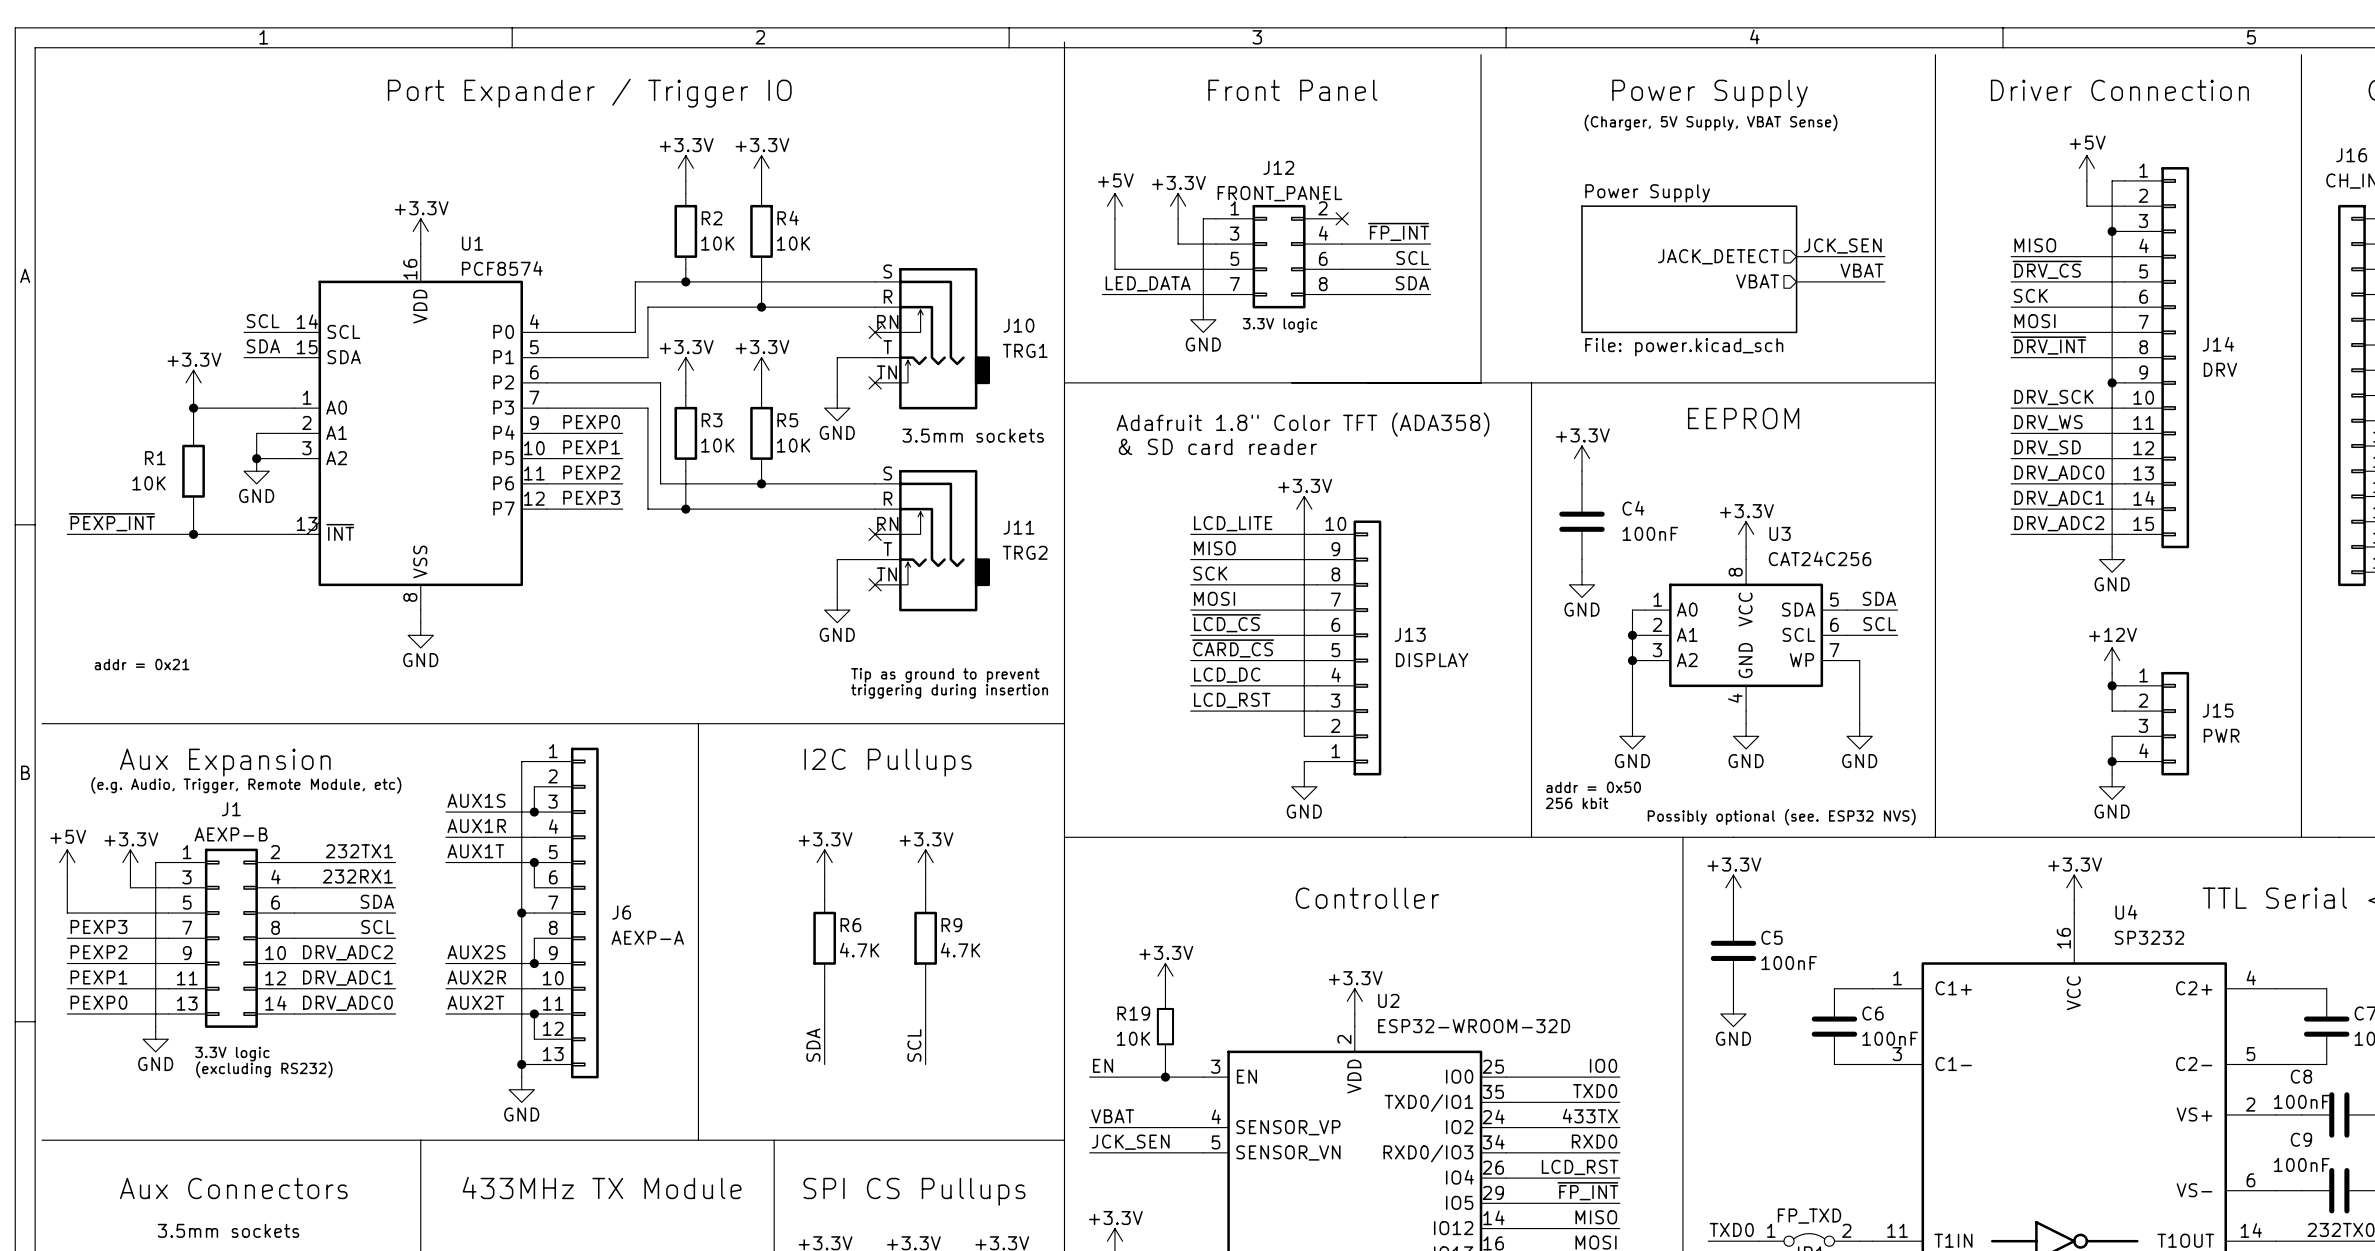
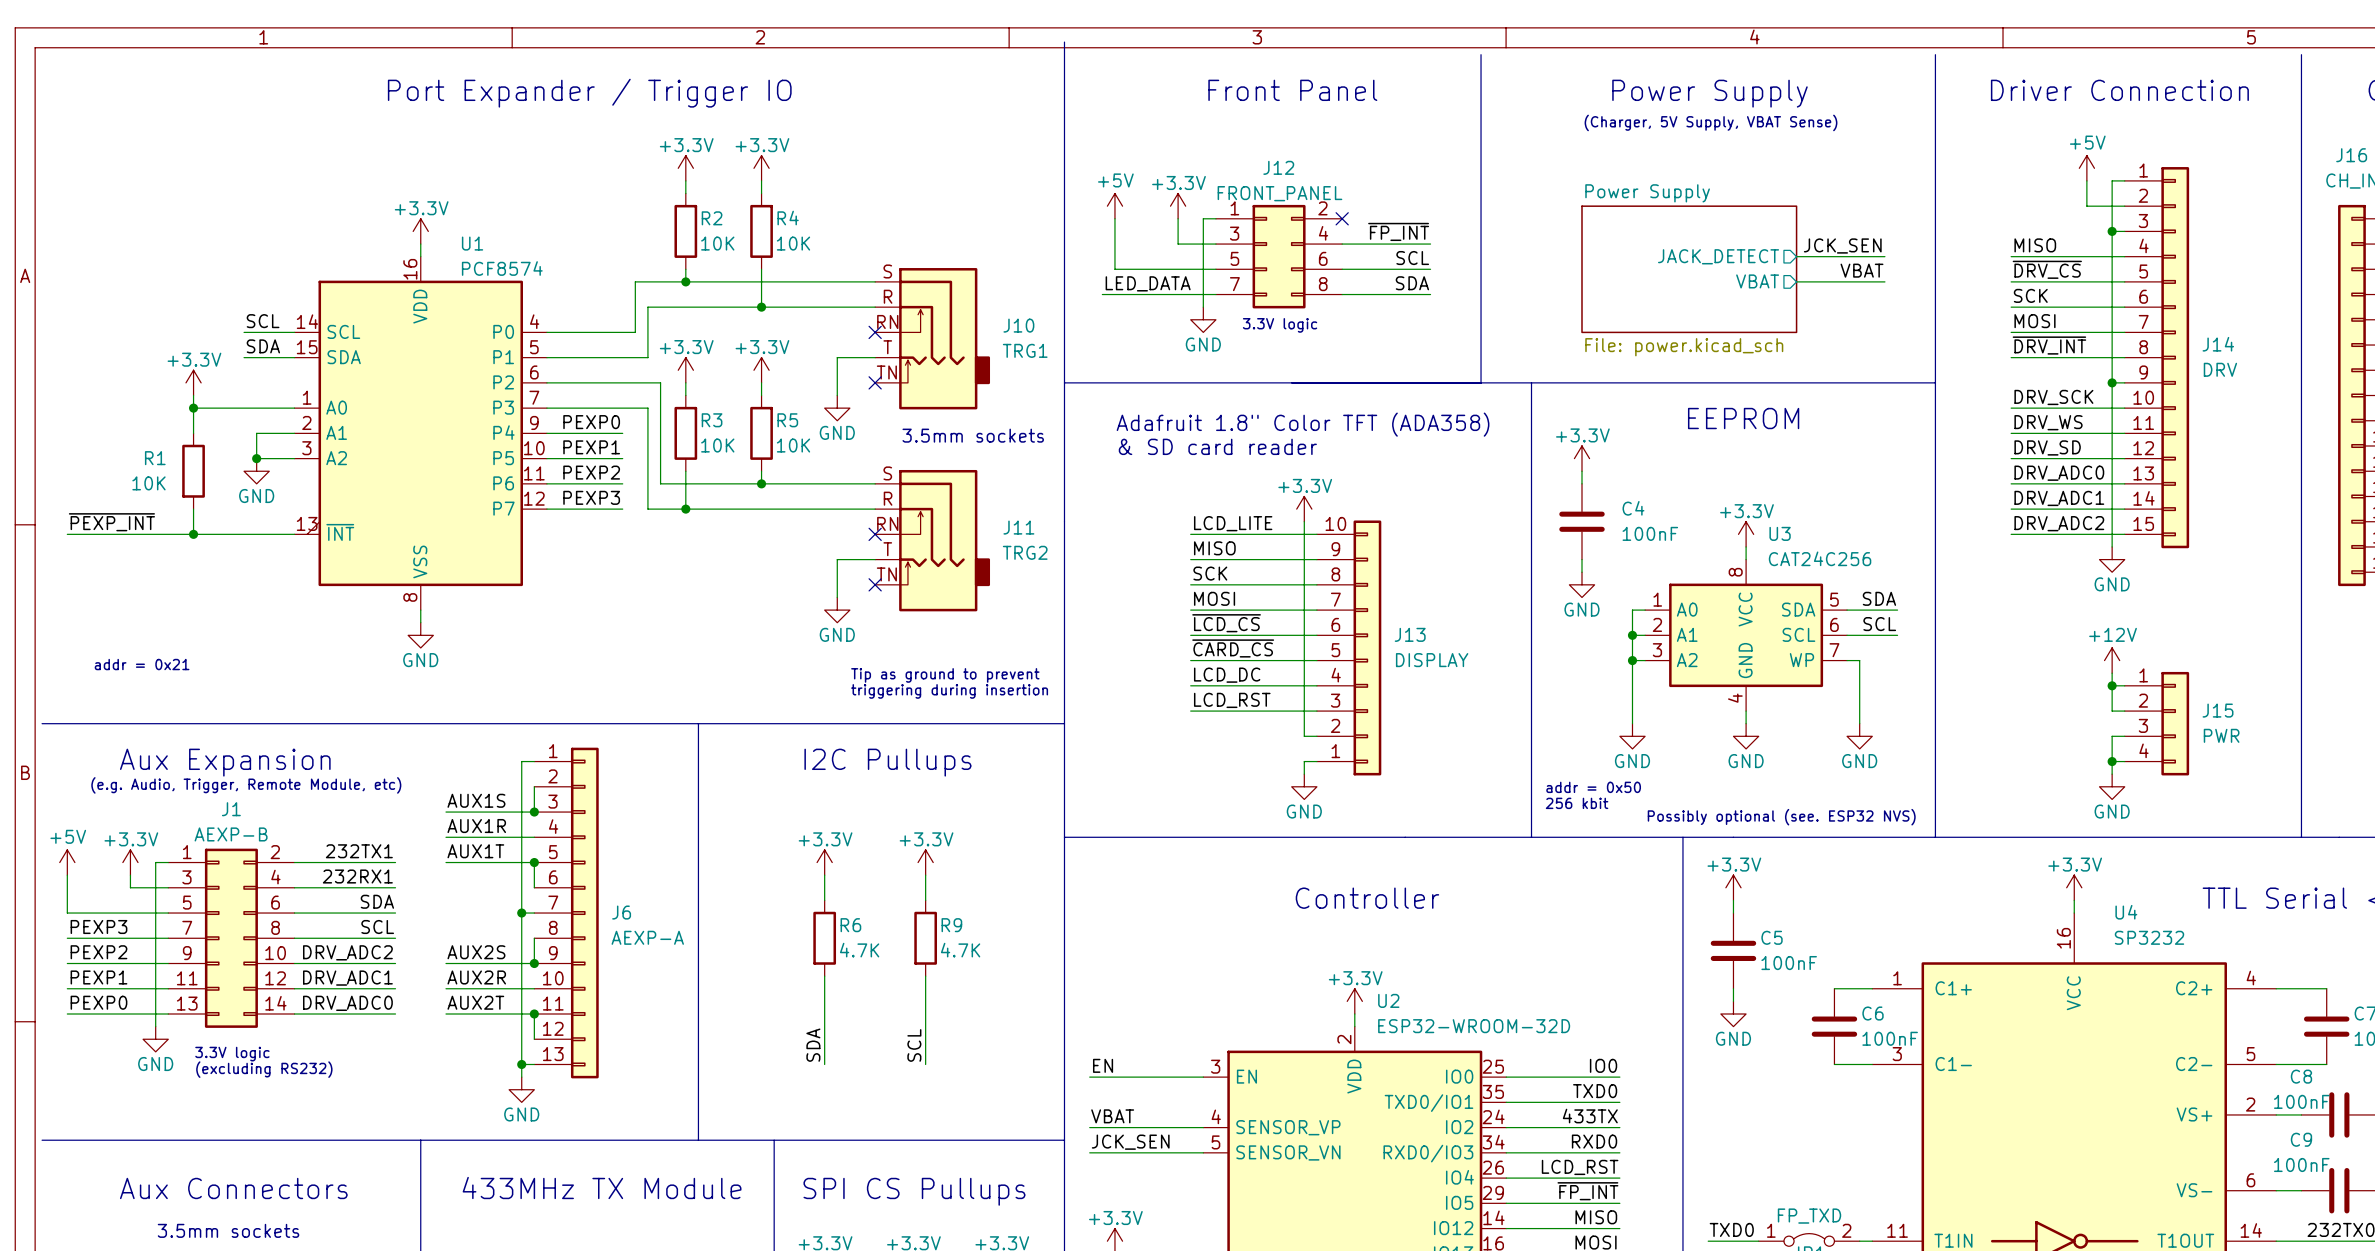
power symbol: +3.3V (1165, 976) -> none
wire: (1165, 988) (1165, 1001) -> none
R19: 10K (1165, 1026) -> none
wire: (1165, 1051) (1165, 1077) -> none
junction: (1165, 1077) -> none

